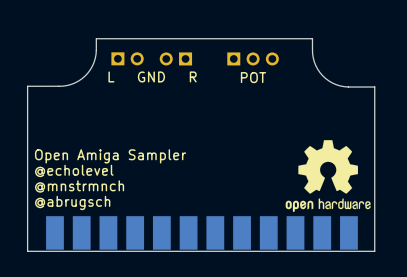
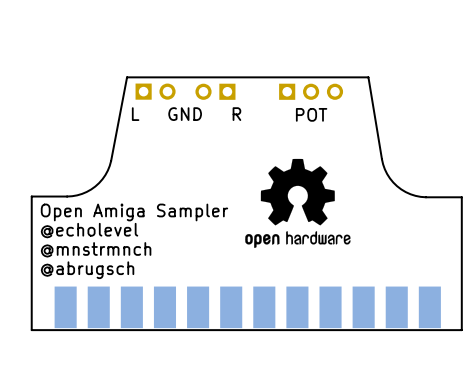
board edge: (27, 143) (27, 86) (62, 86) (81, 78) (94, 62) (96, 38) (312, 38) (314, 61) (325, 78) (344, 86) (374, 87) (374, 144) -> (31, 196) (77, 195) (91, 189) (102, 179) (111, 161) (127, 77) (368, 77) (381, 159) (389, 178) (401, 189) (415, 195) (461, 197)
drawing position: (328, 176) -> (297, 203)

